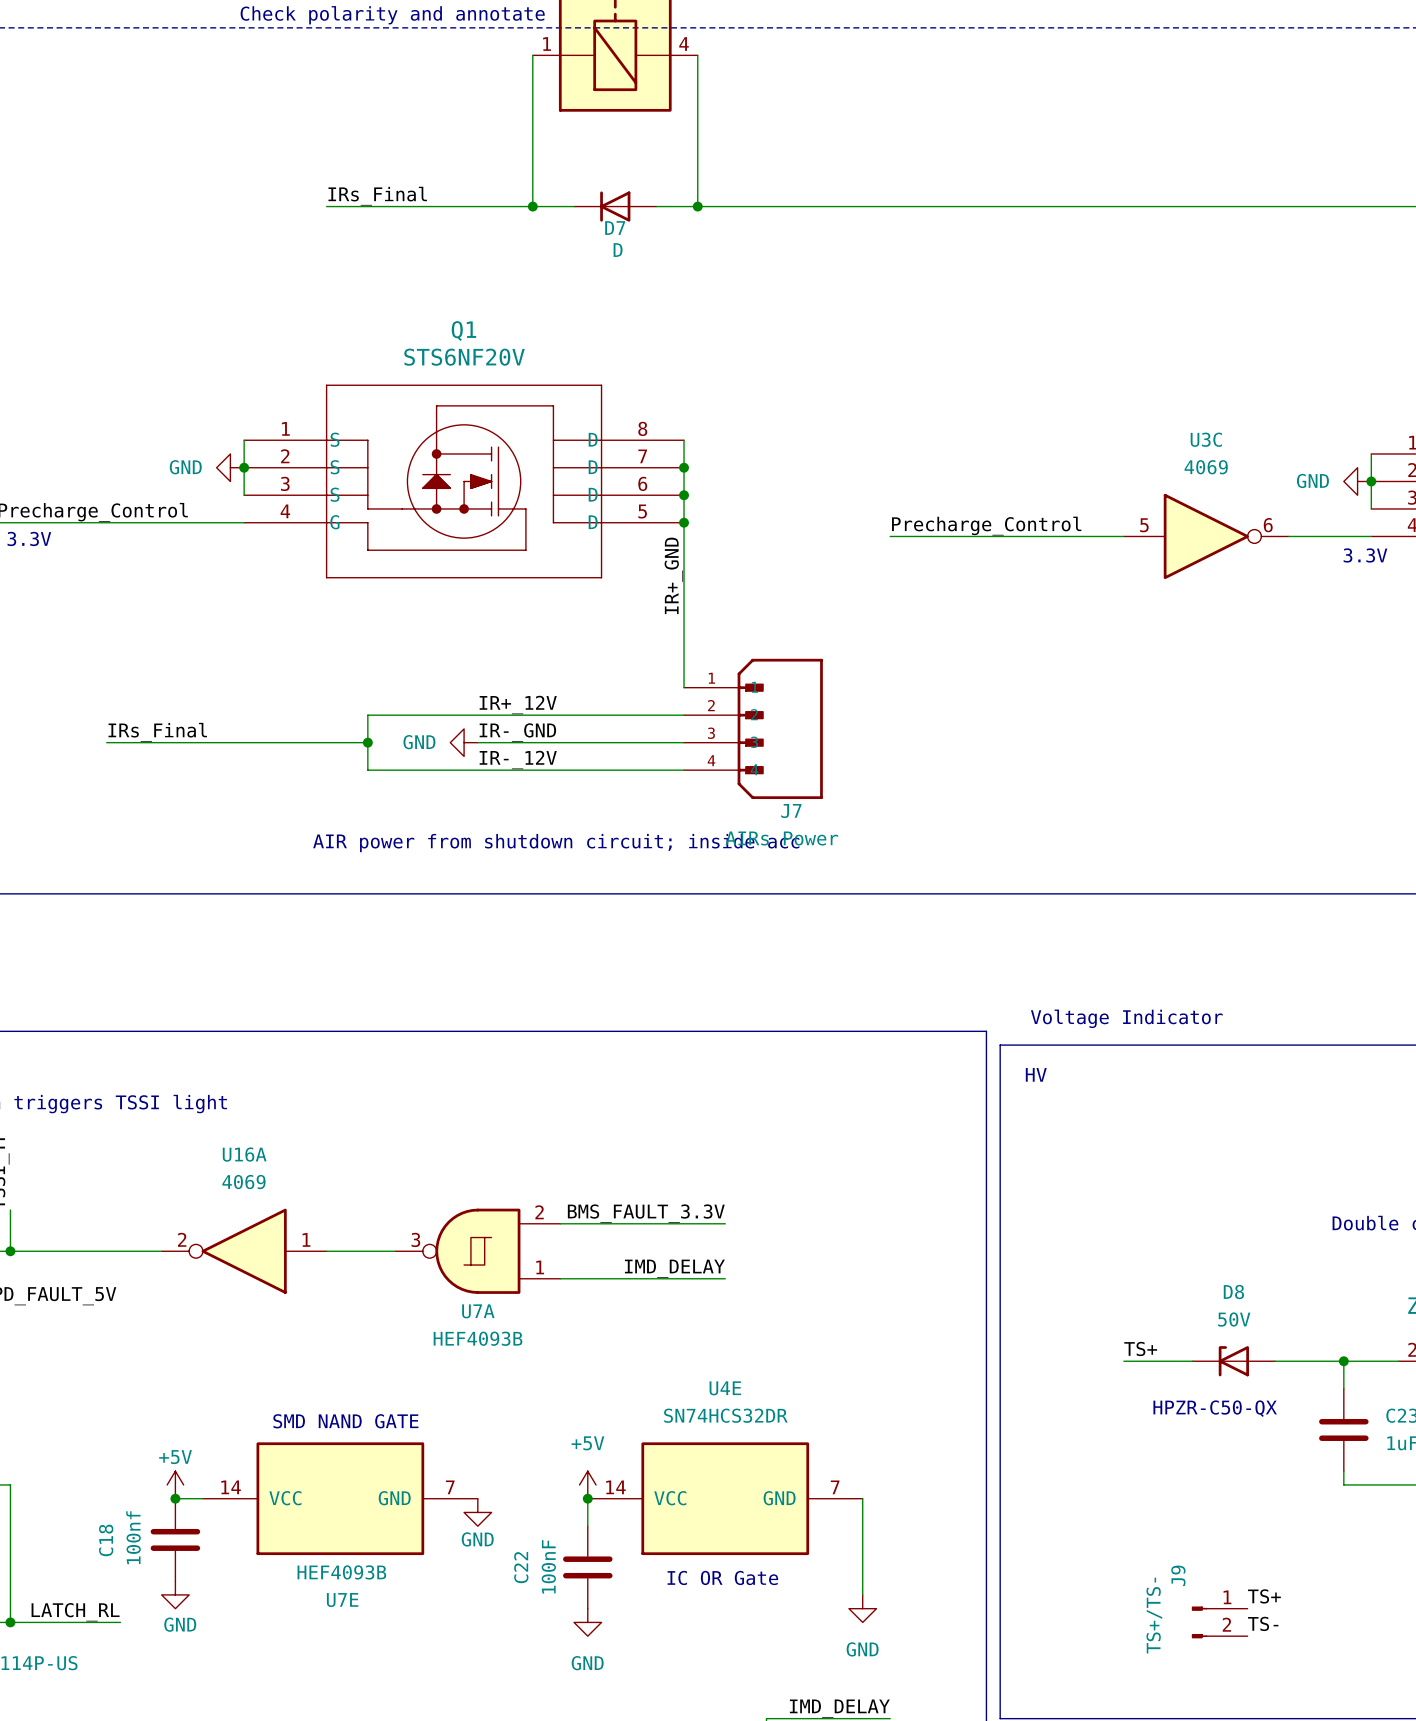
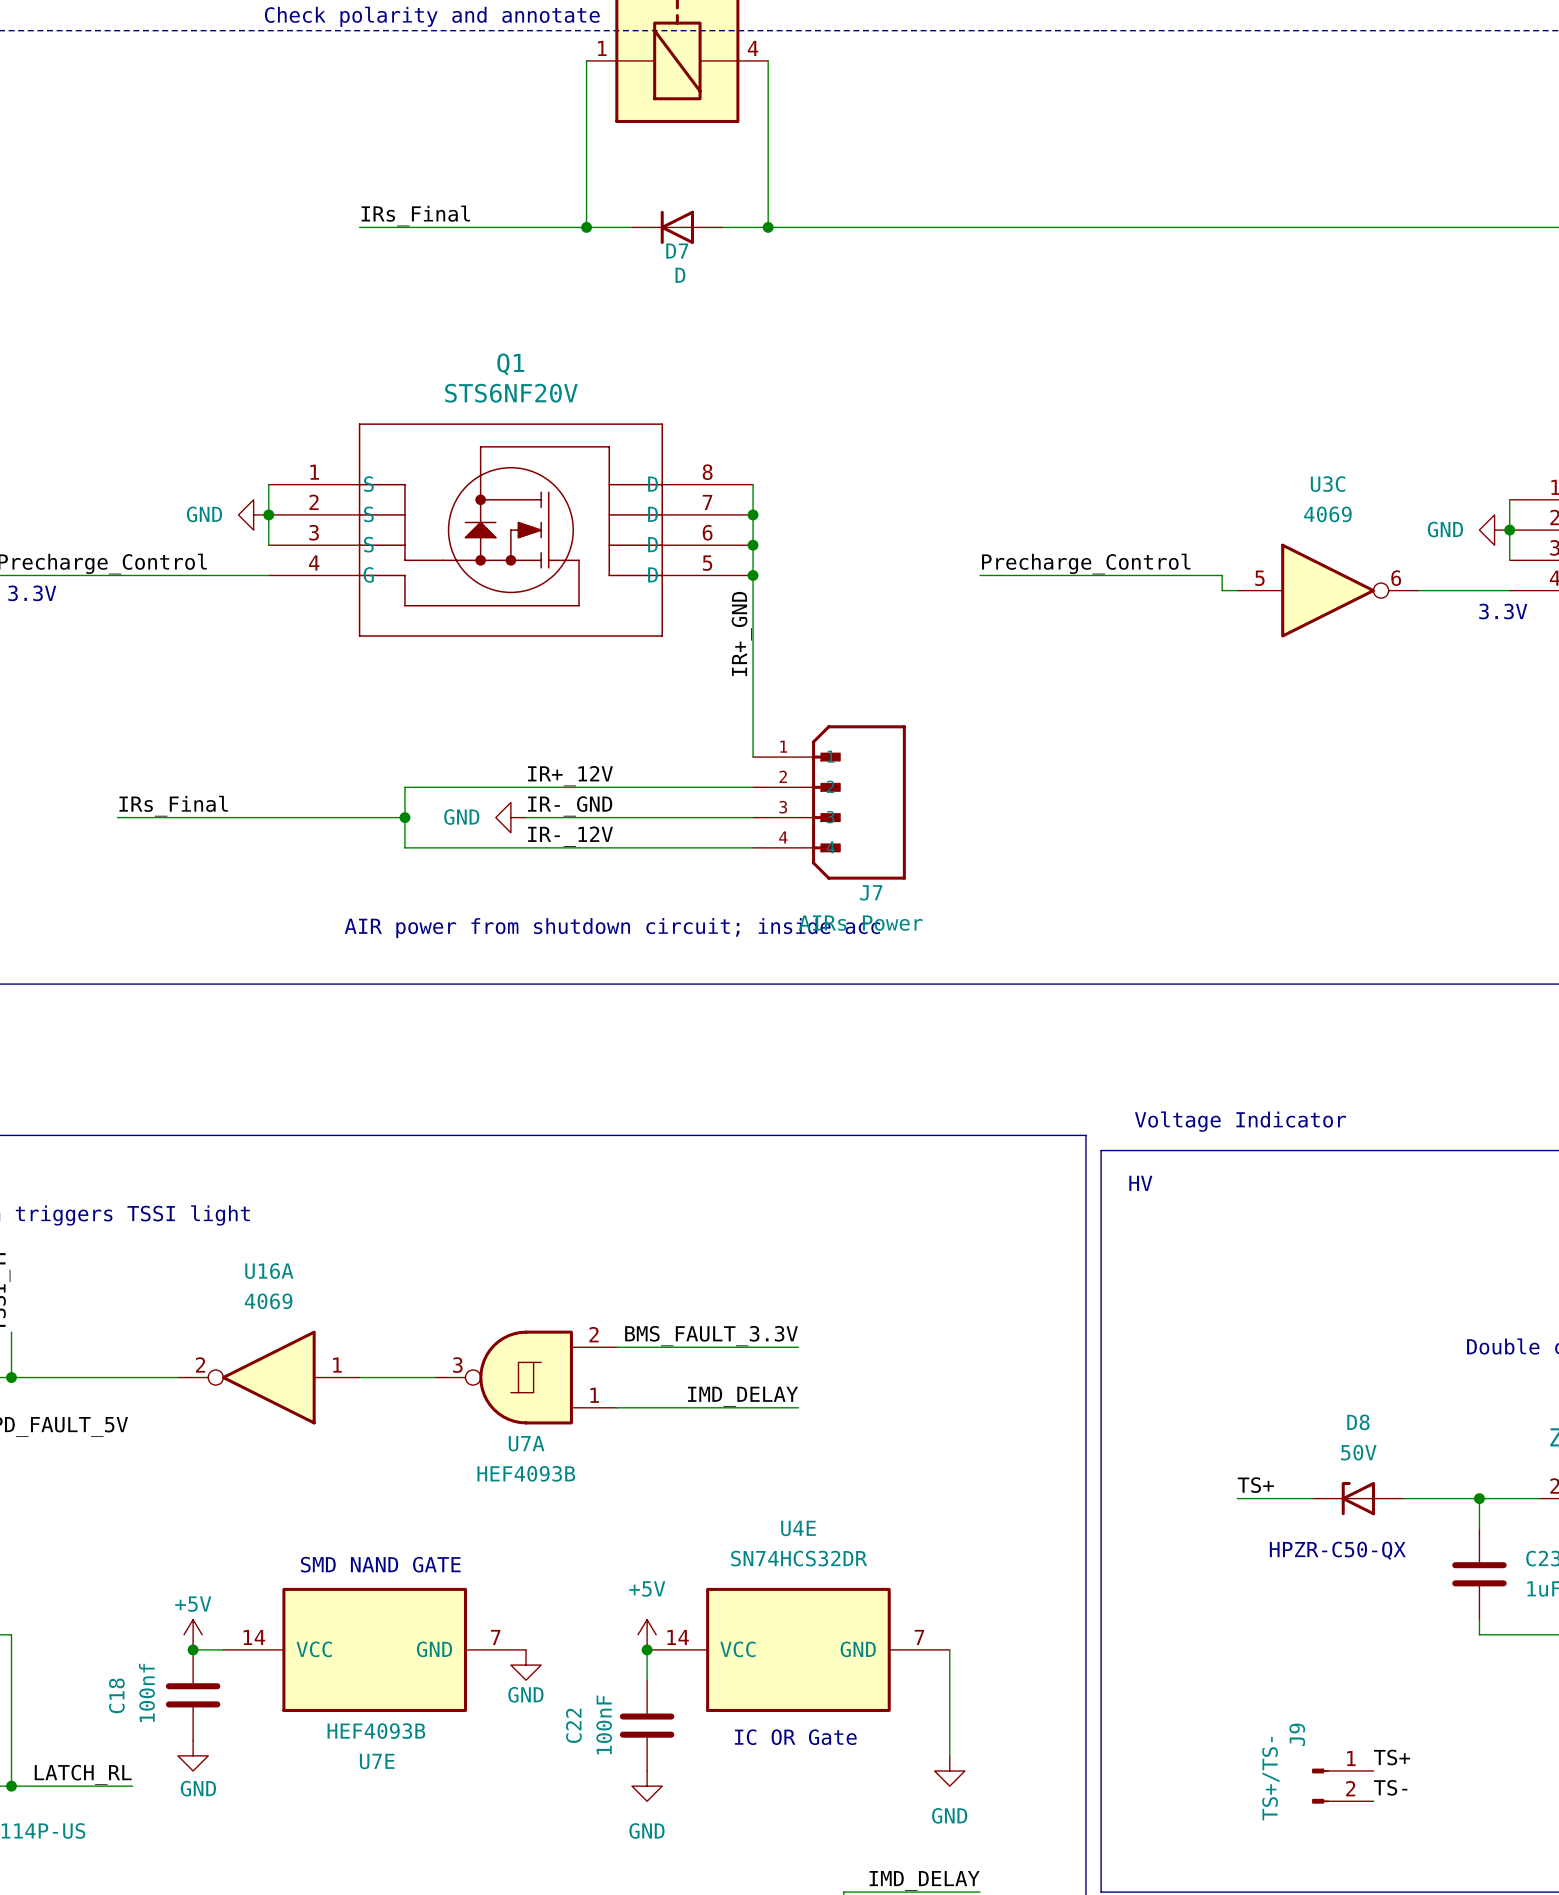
label position: Precharge_Control (986, 526) -> Precharge_Control (1086, 564)
wire: (890, 536) (1110, 536) -> (980, 575) (1222, 575) (1222, 590)

